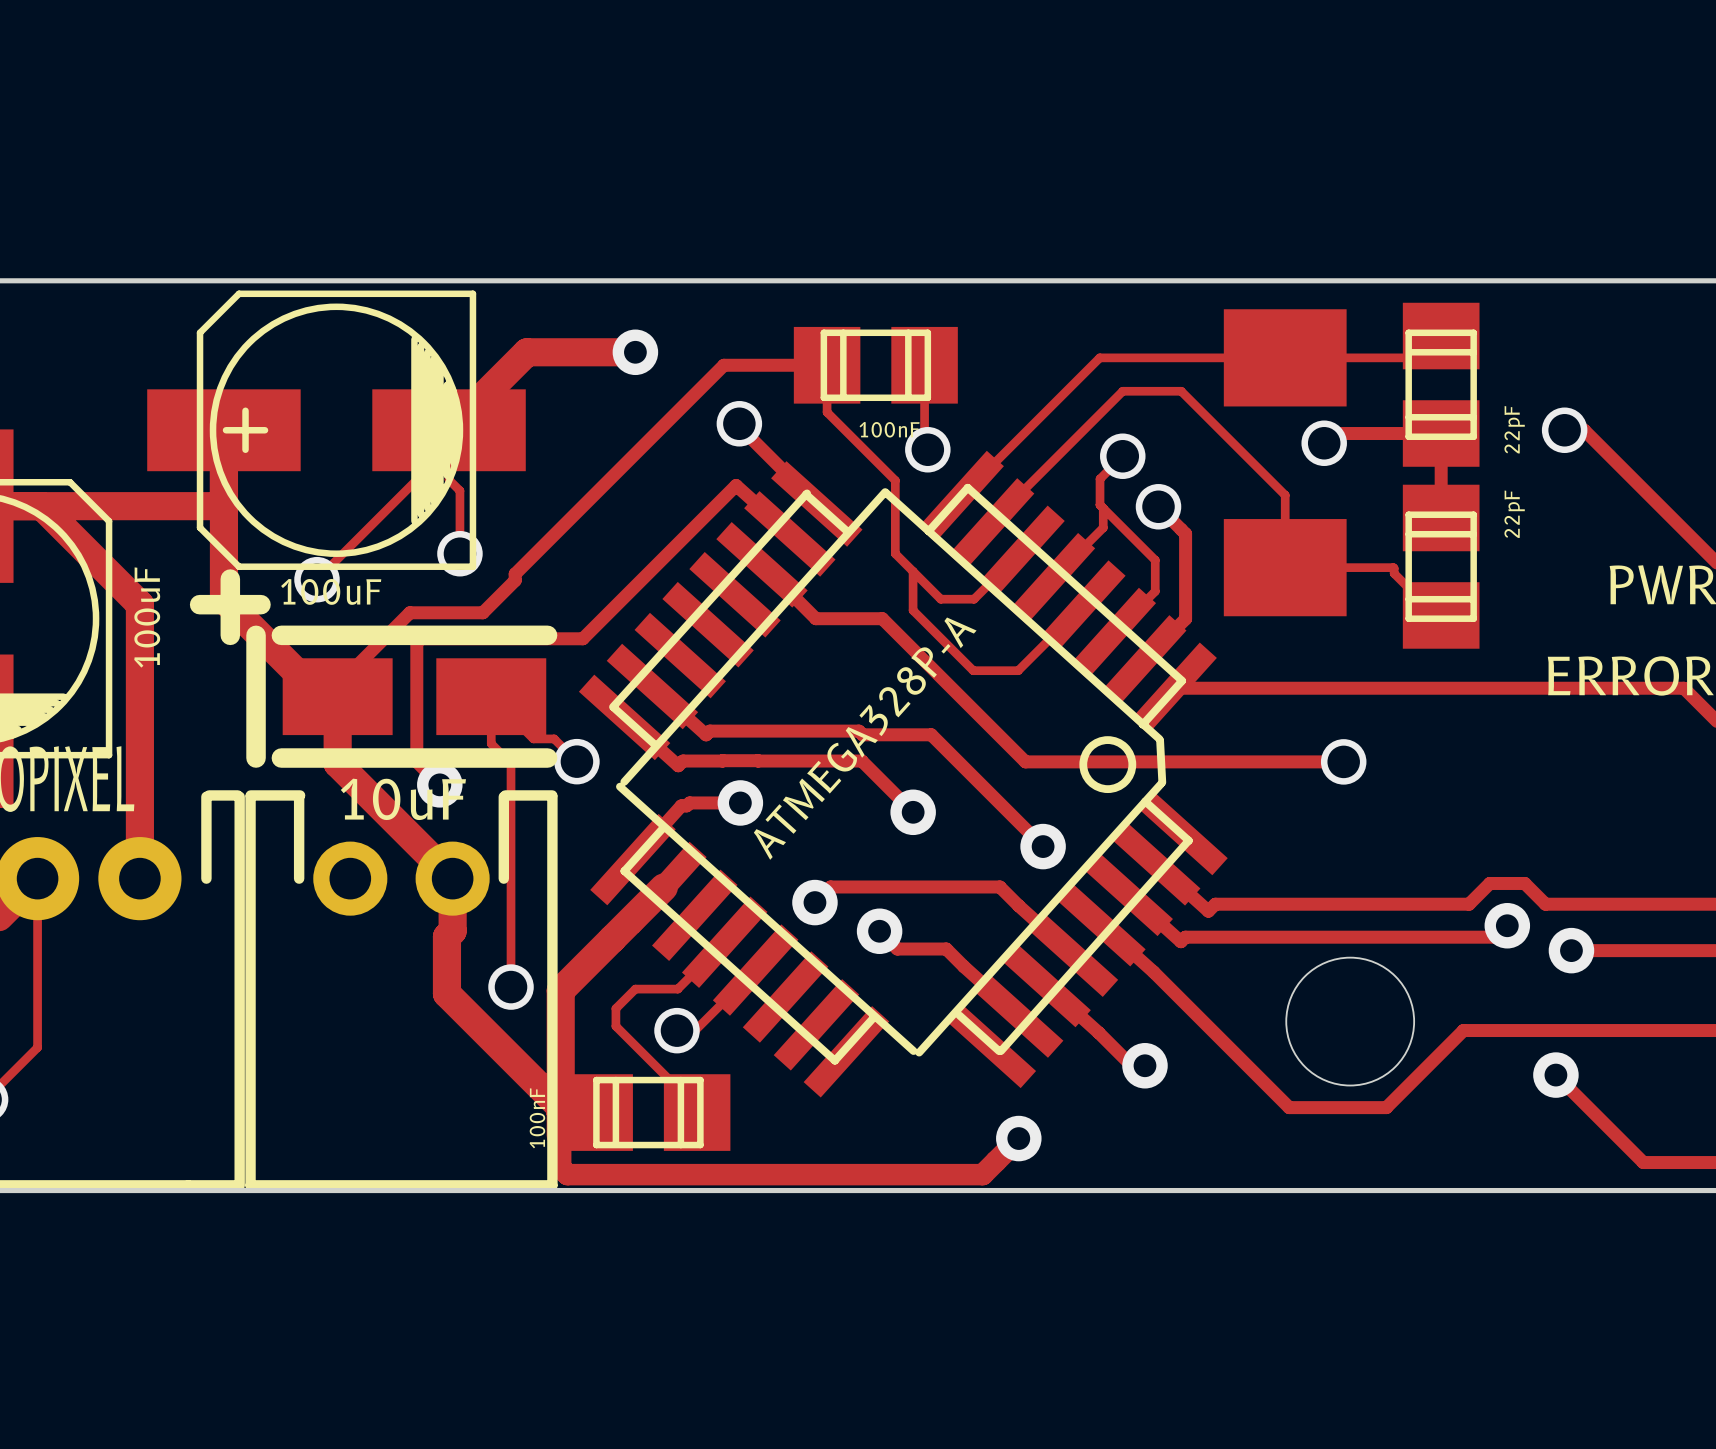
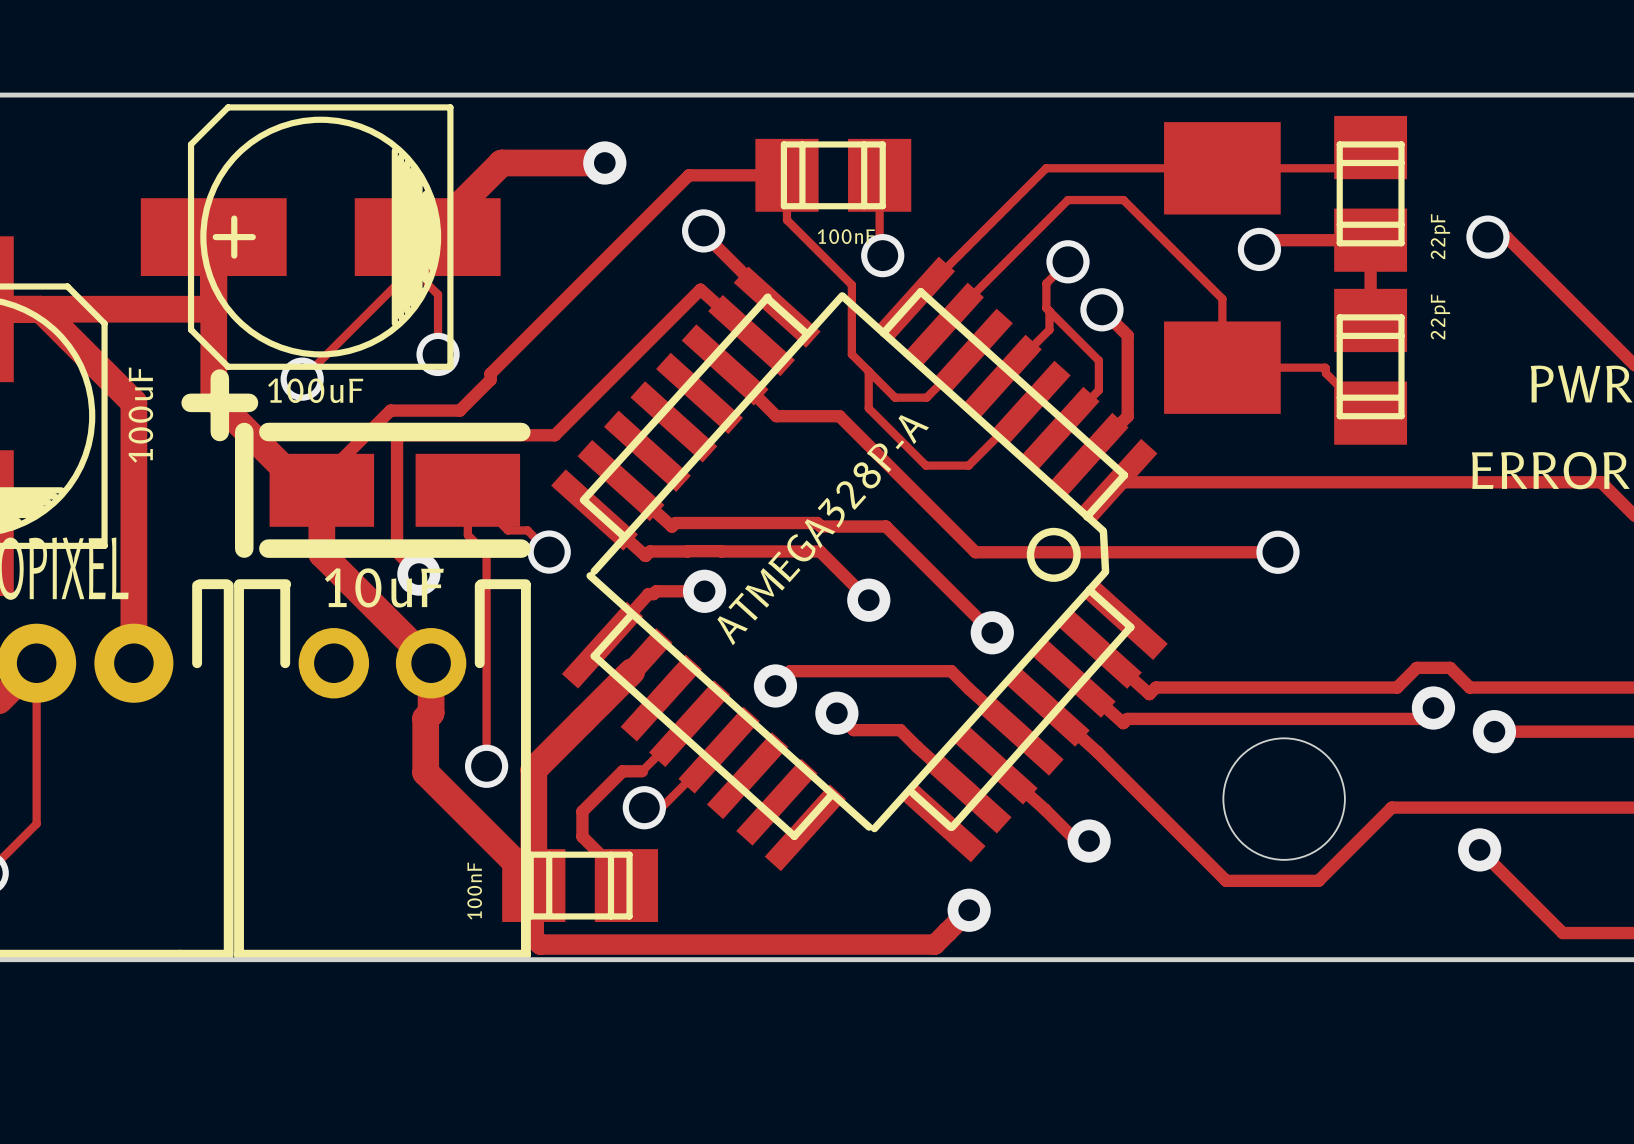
track: (677, 989) (635, 989) (615, 1008) (615, 1026) (697, 1107) (697, 1112) -> none
track: none -> (642, 771) (622, 771) (582, 811) (582, 836) (626, 880) (626, 885)
part position: (648, 1112) -> (580, 885)

